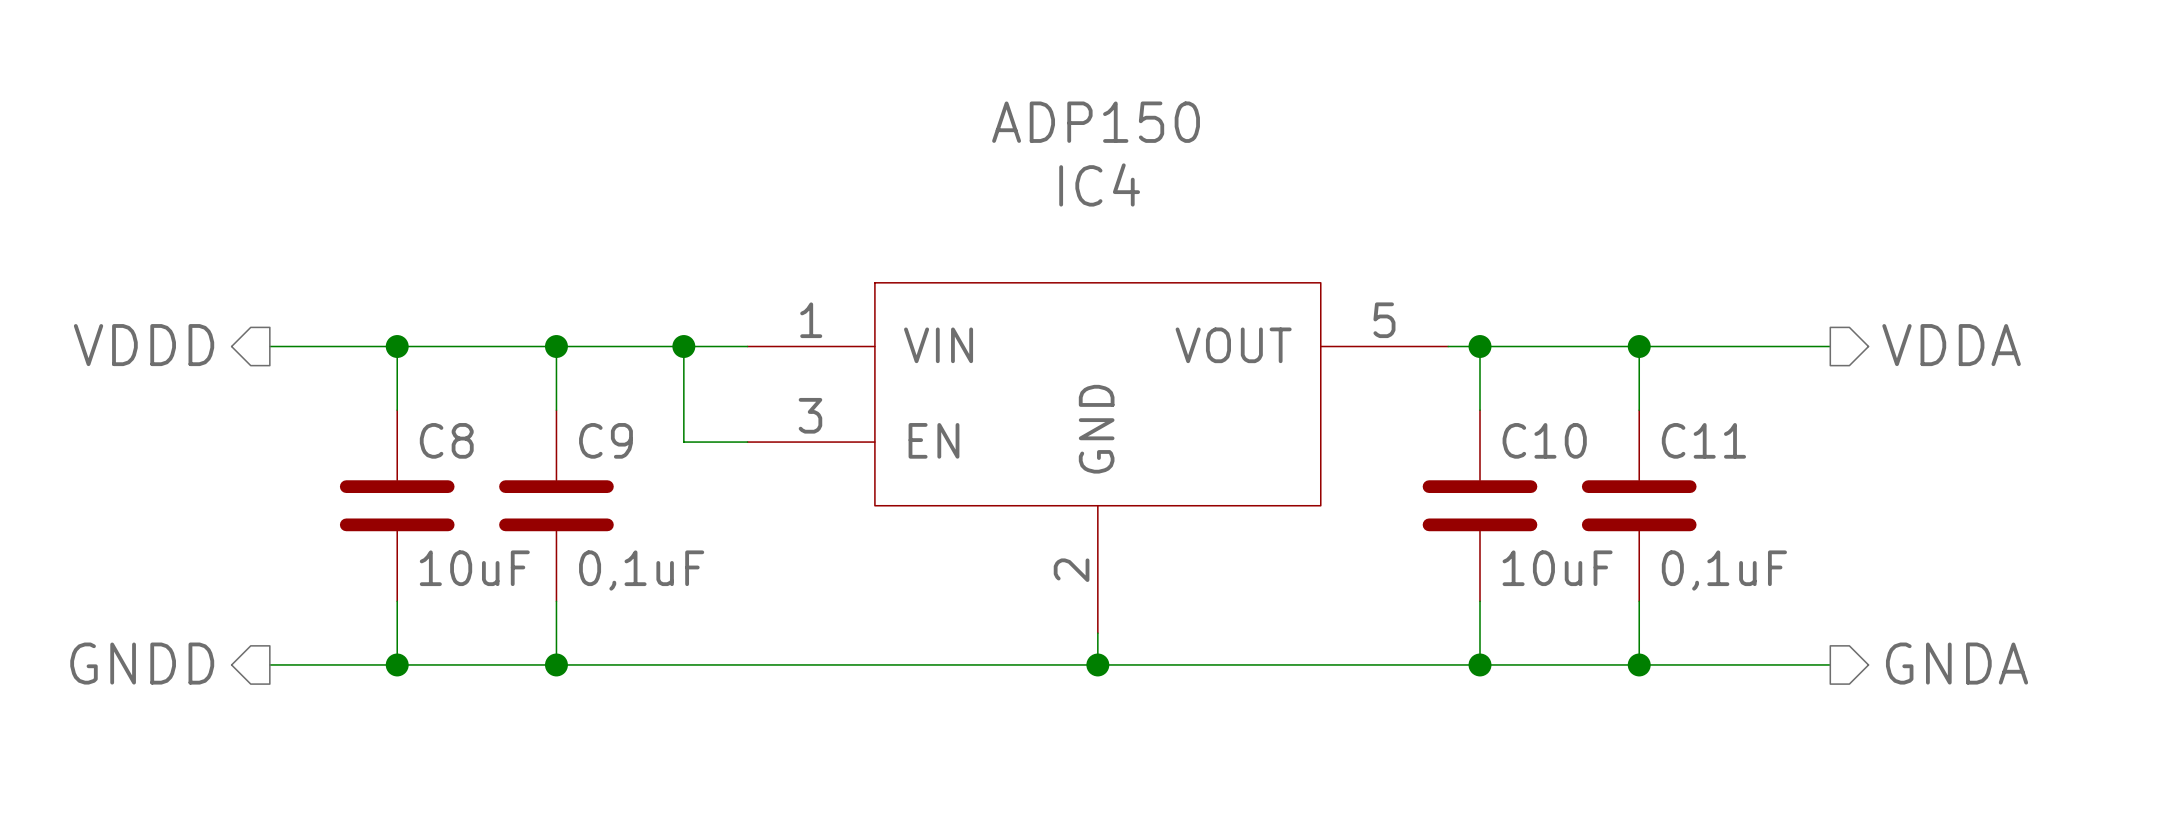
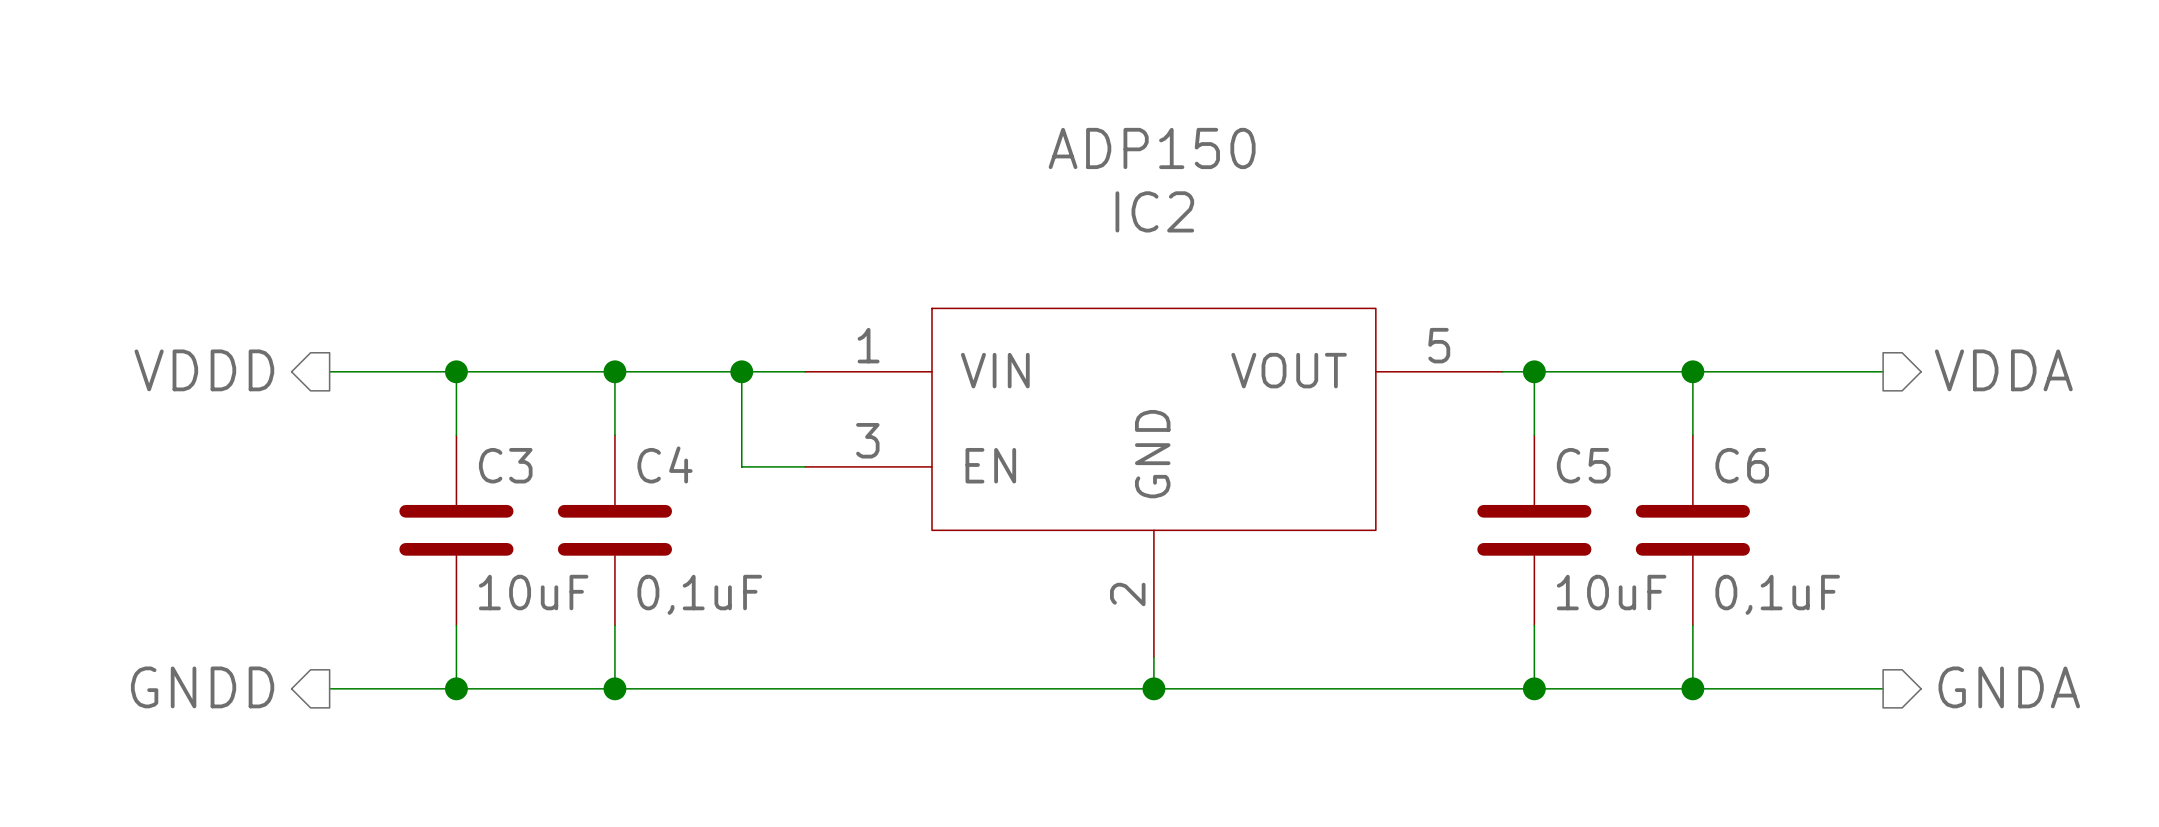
IC4 name: IC4 (1099, 184) -> IC2 (1154, 211)
C8 name: C8 (446, 440) -> C3 (505, 465)
C9 name: C9 (605, 440) -> C4 (665, 464)
C10 name: C10 (1544, 440) -> C5 (1583, 465)
C11 name: C11 (1703, 440) -> C6 (1742, 465)

